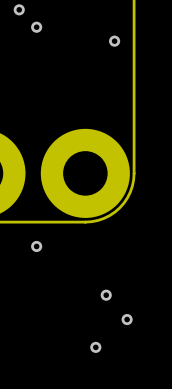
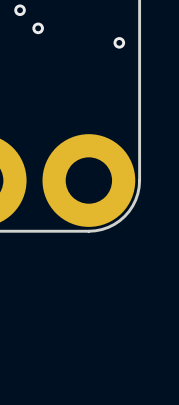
via: (36, 246) -> none
via: (106, 295) -> none
via: (127, 319) -> none
via: (95, 347) -> none

